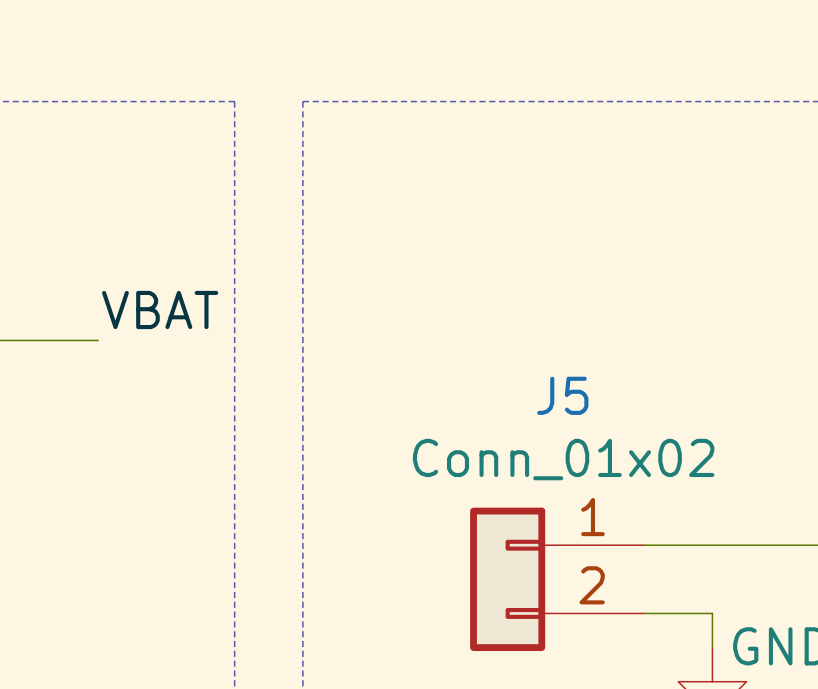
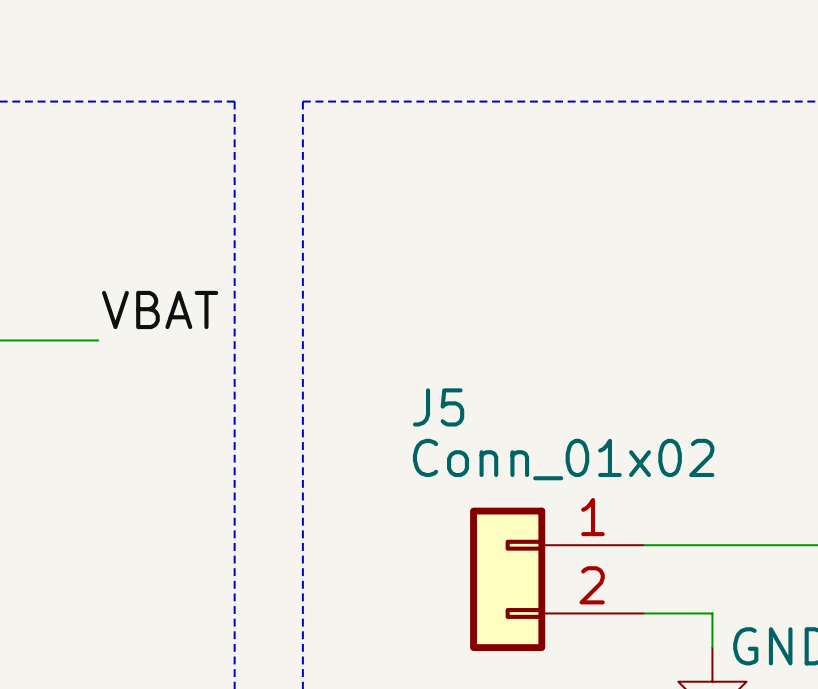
J5 name position: J5 (562, 395) -> J5 (438, 407)

